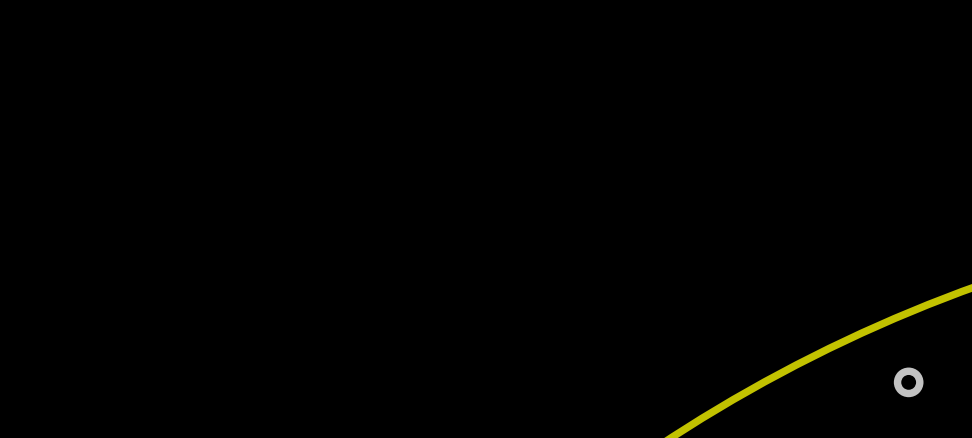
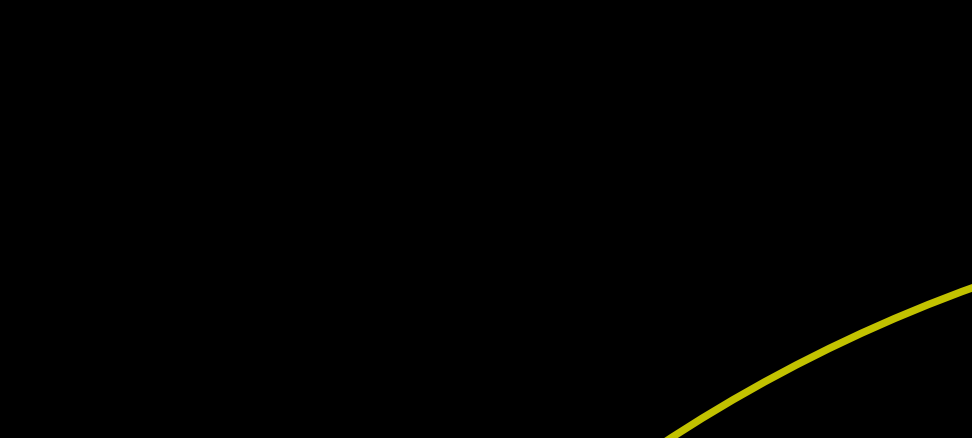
via: (908, 382) -> none

